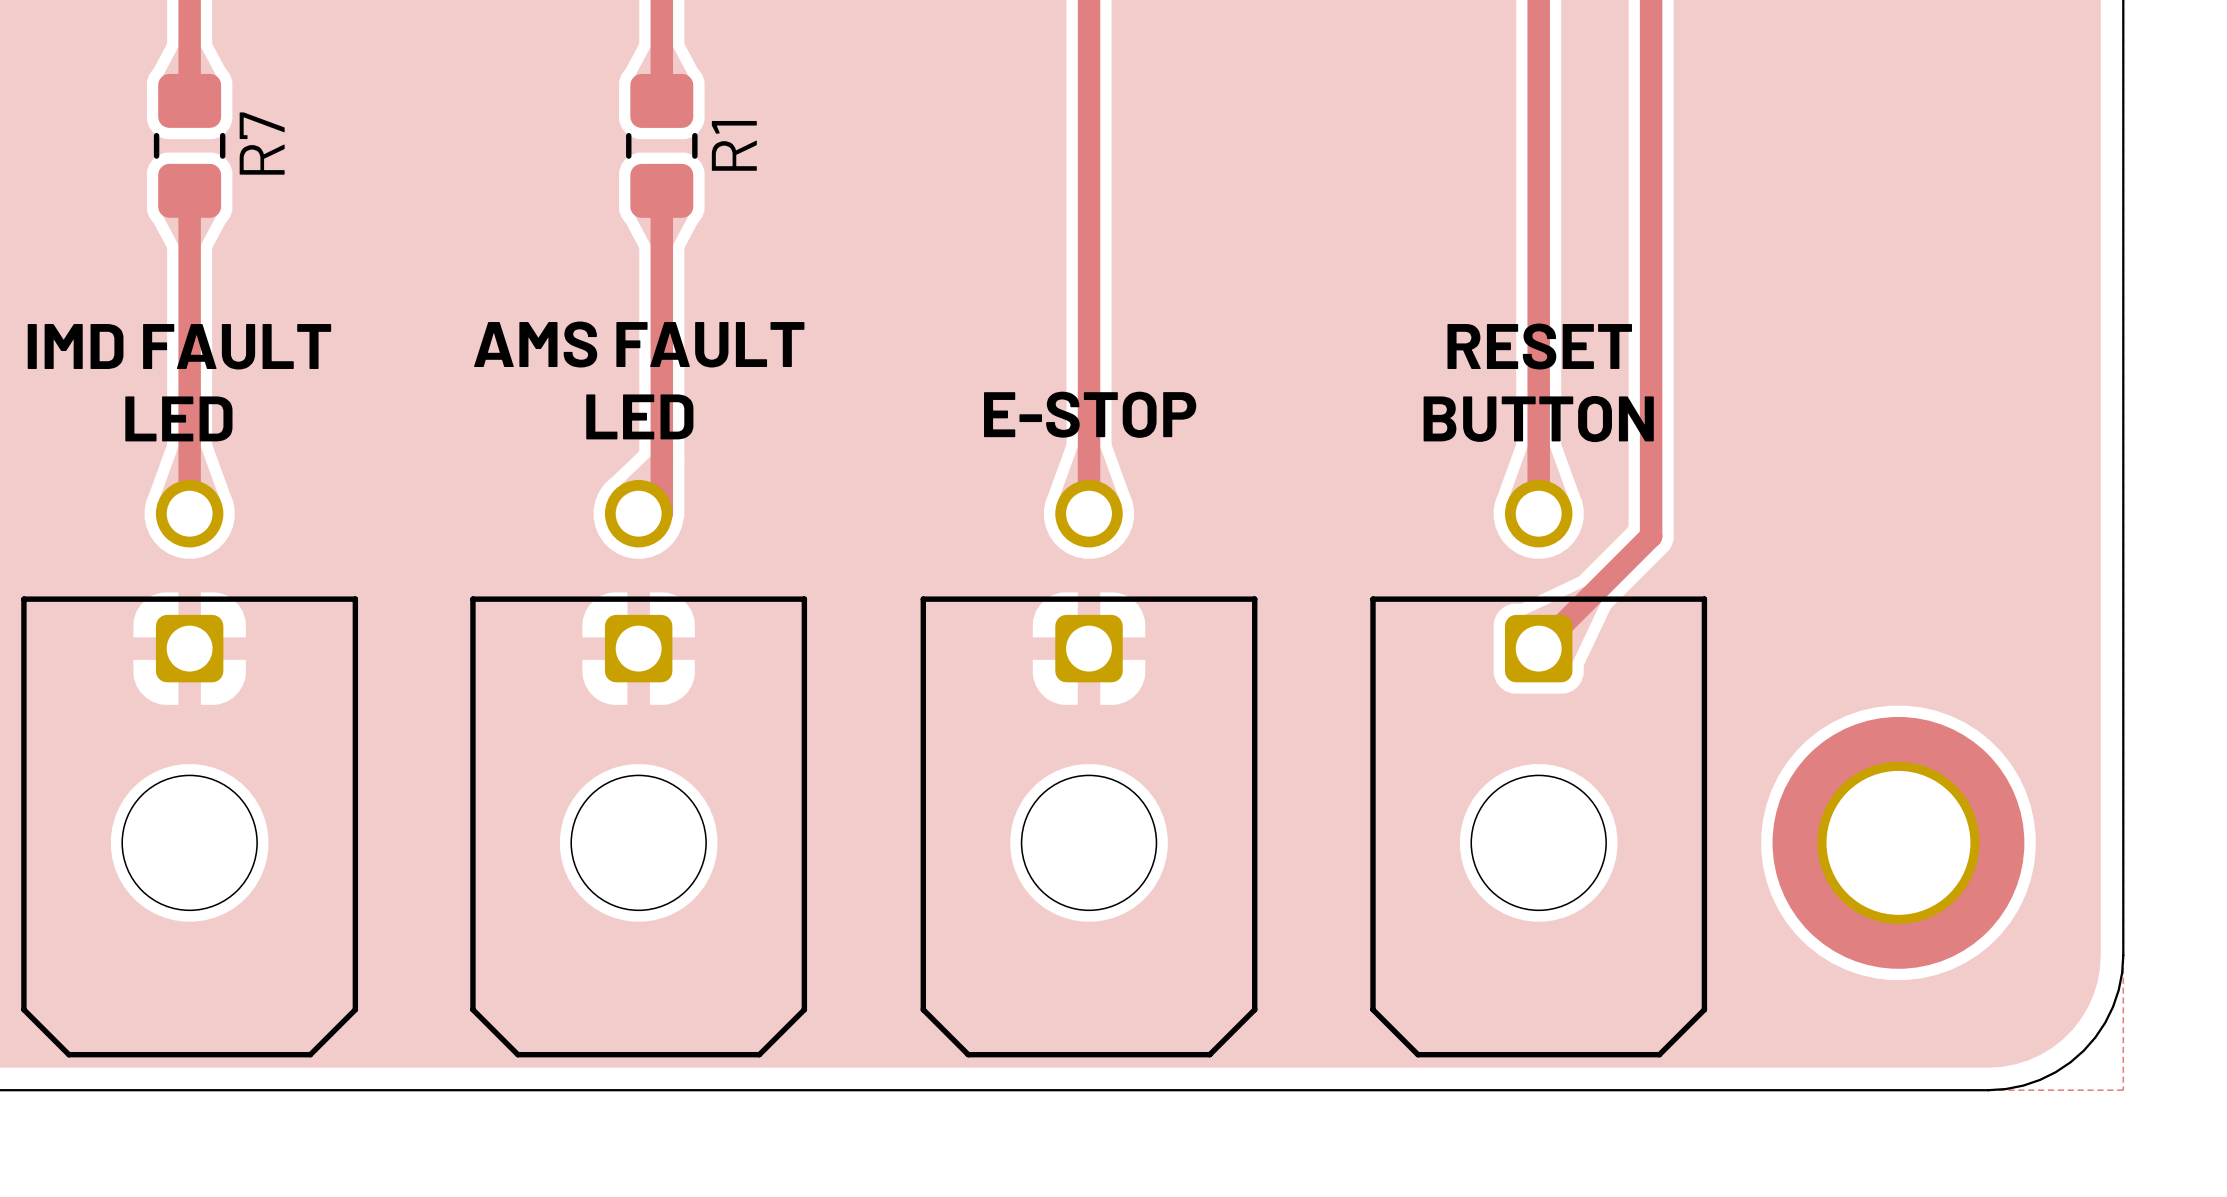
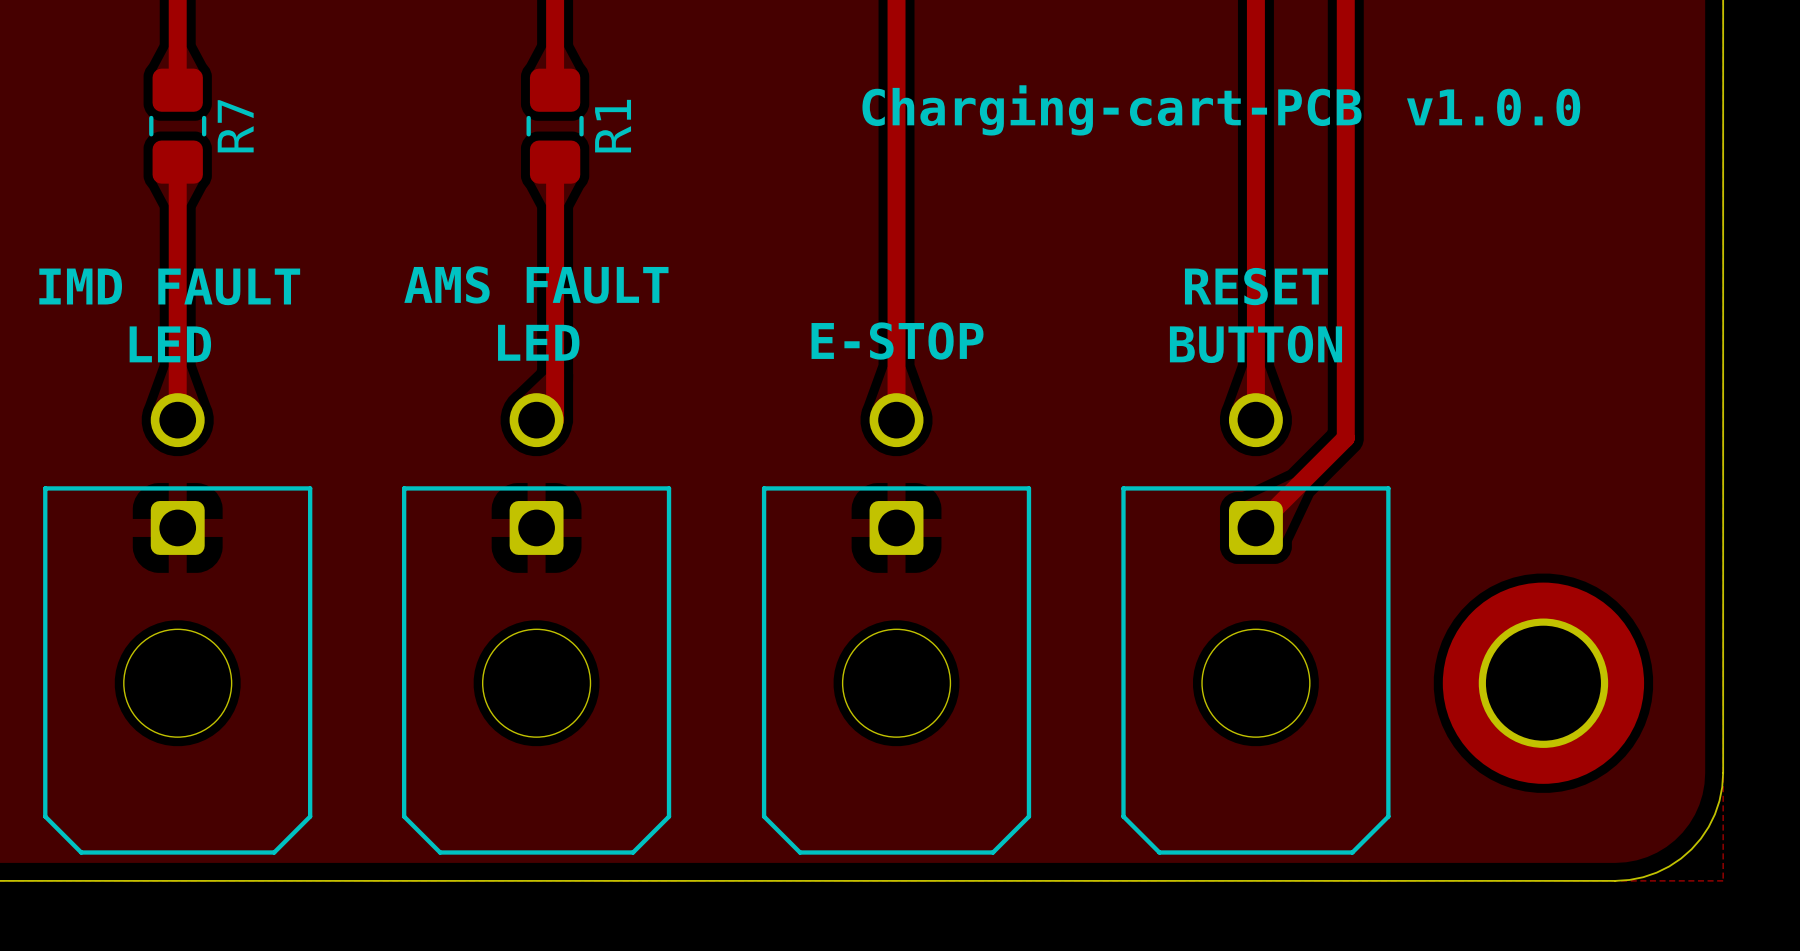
text: none -> v1.0.0 (1493, 107)
text: none -> Charging-cart-PCB (1112, 110)

